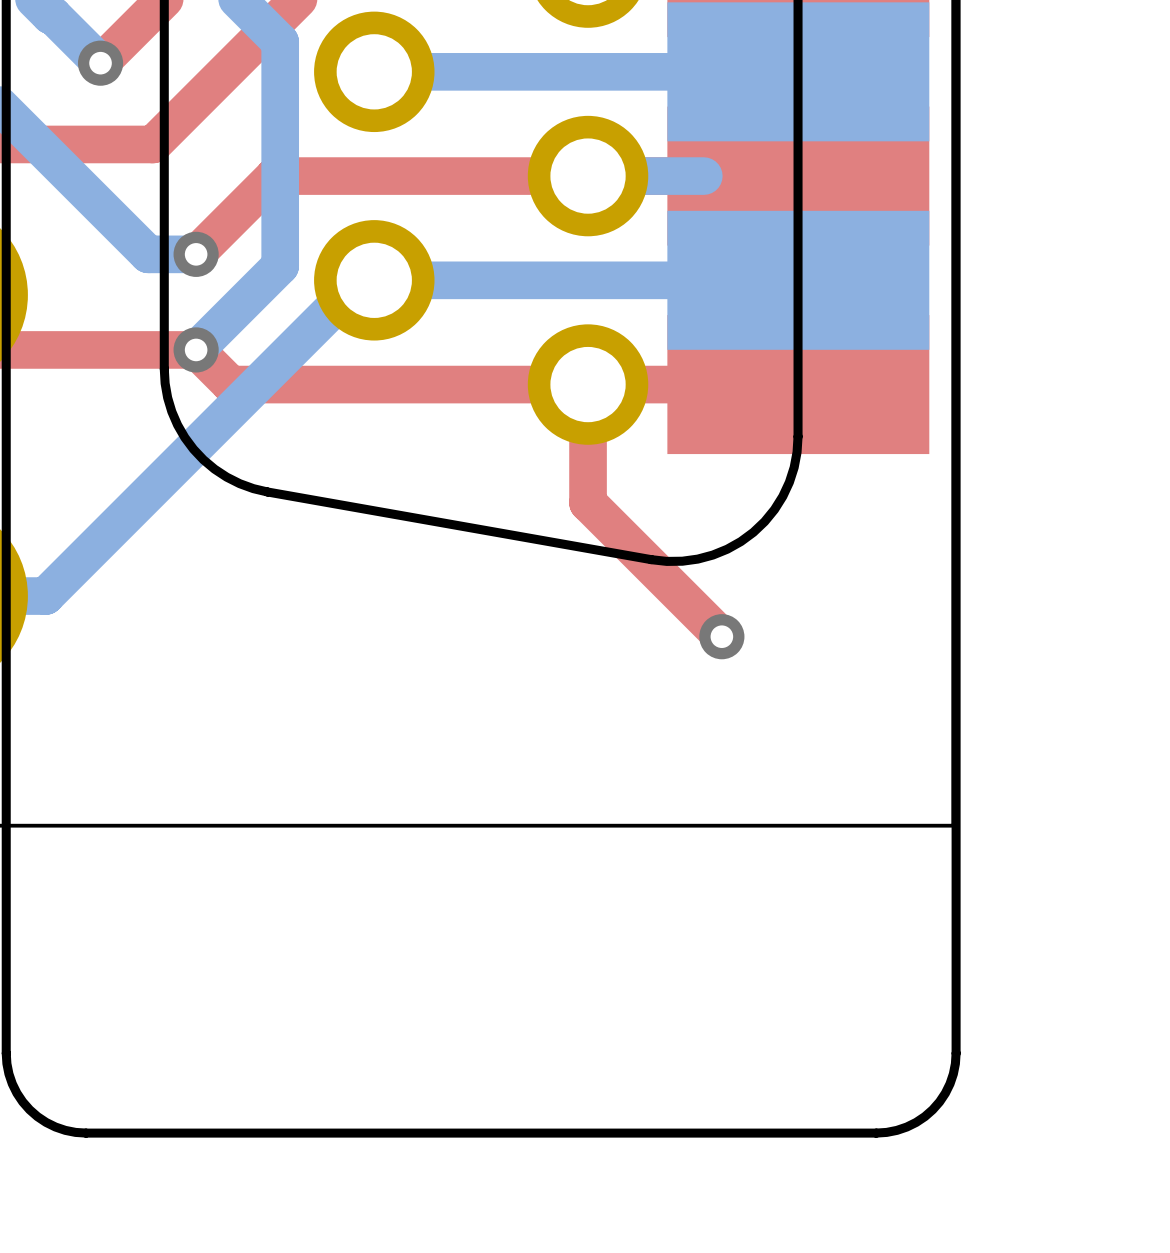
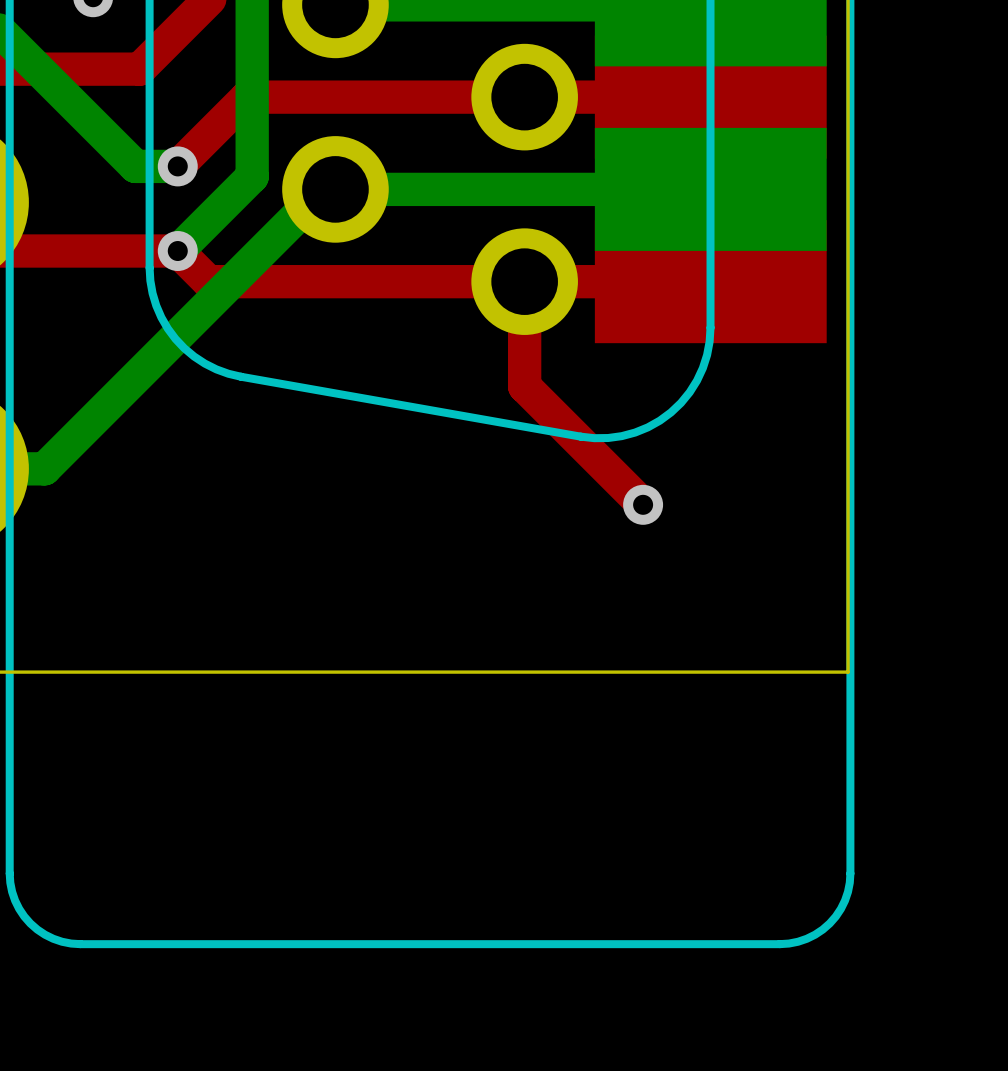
bottom track: (703, 176) (588, 176) -> none

